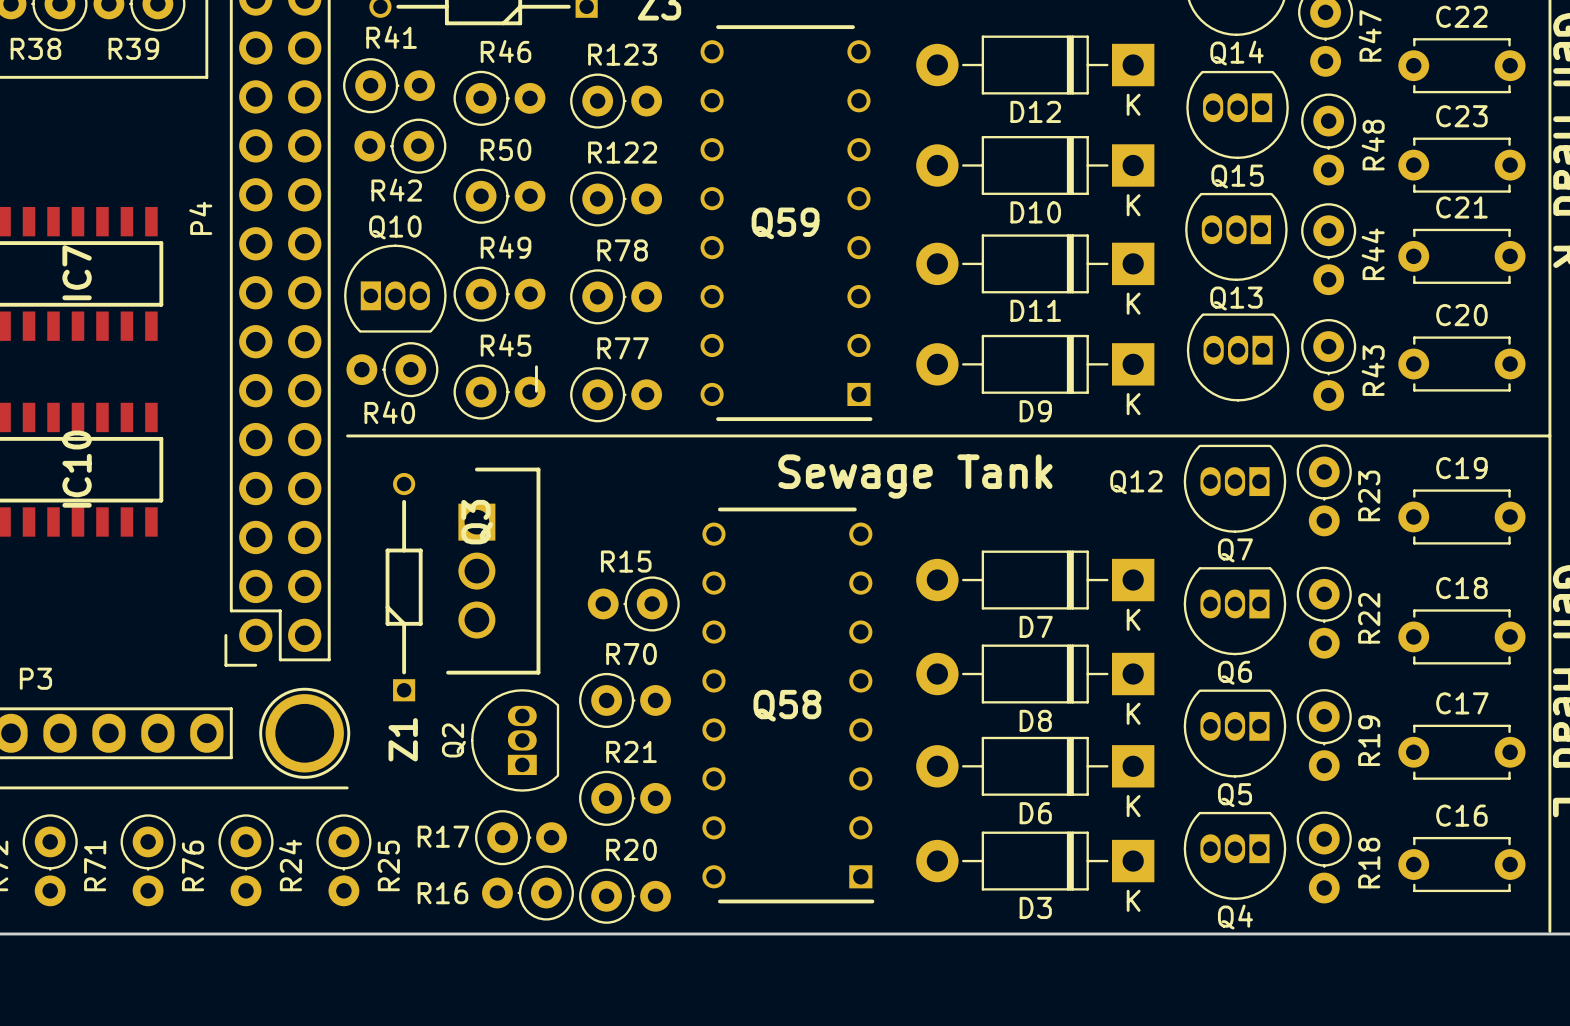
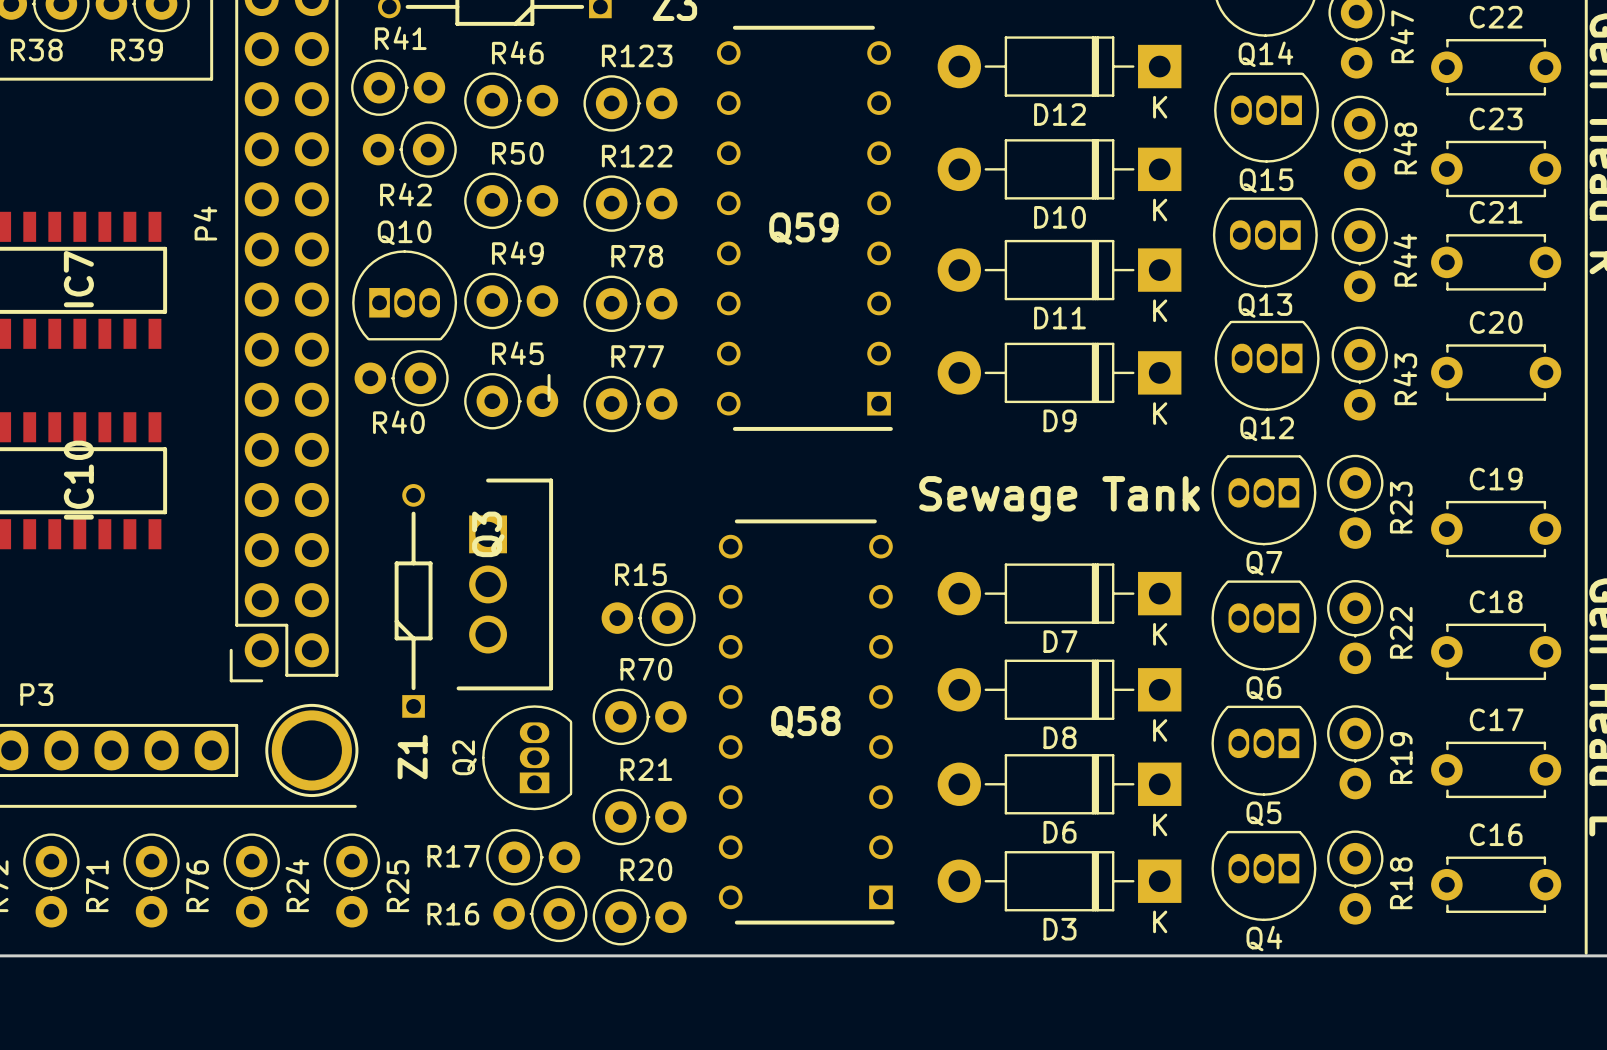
line: (347, 435) (1549, 435) -> none
text position: Sewage Tank (915, 476) -> Sewage Tank (1059, 498)
Q12 name position: Q12 (1136, 482) -> Q12 (1267, 428)

